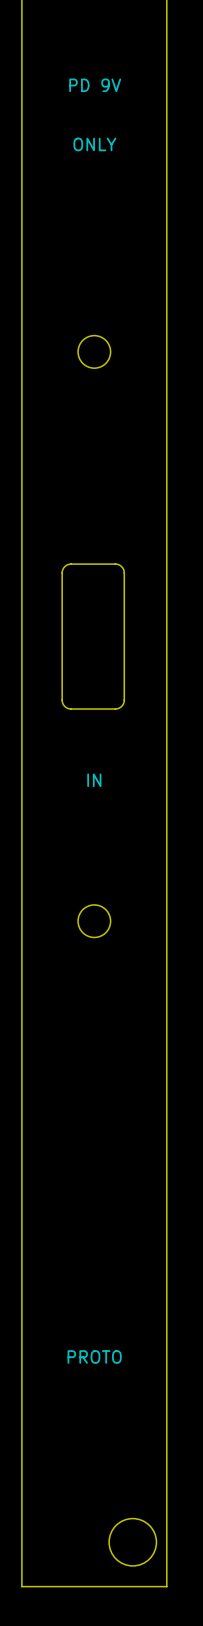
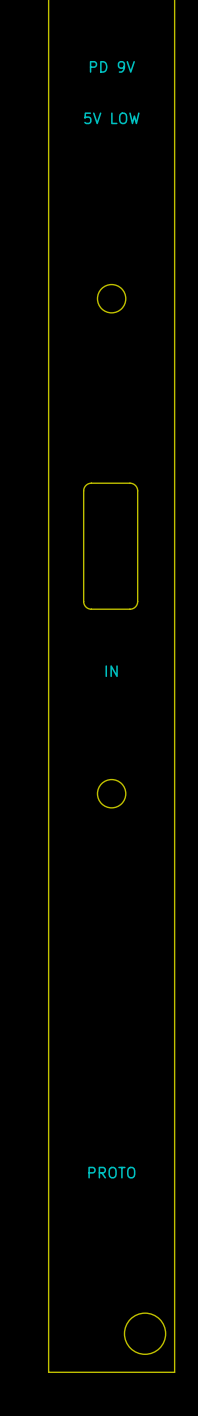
text: ONLY (94, 144) -> 5V LOW (111, 118)

